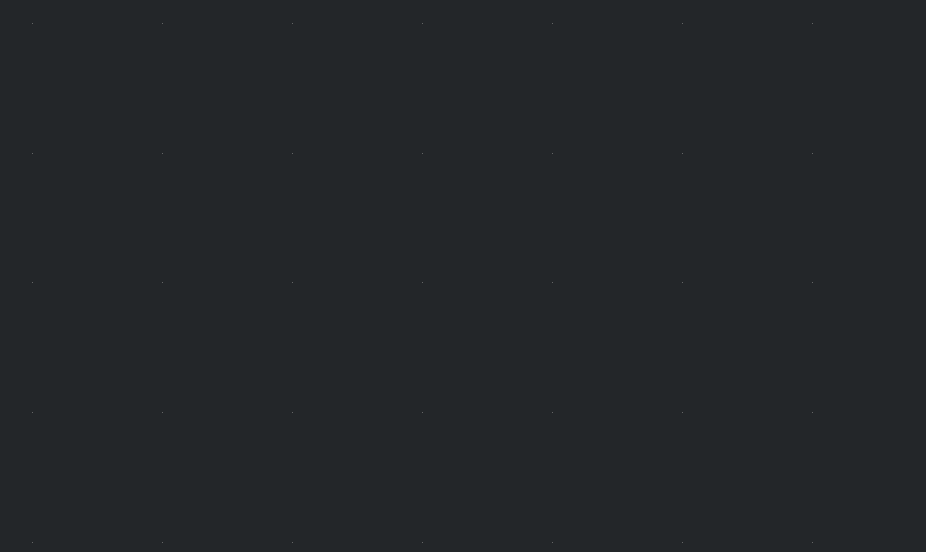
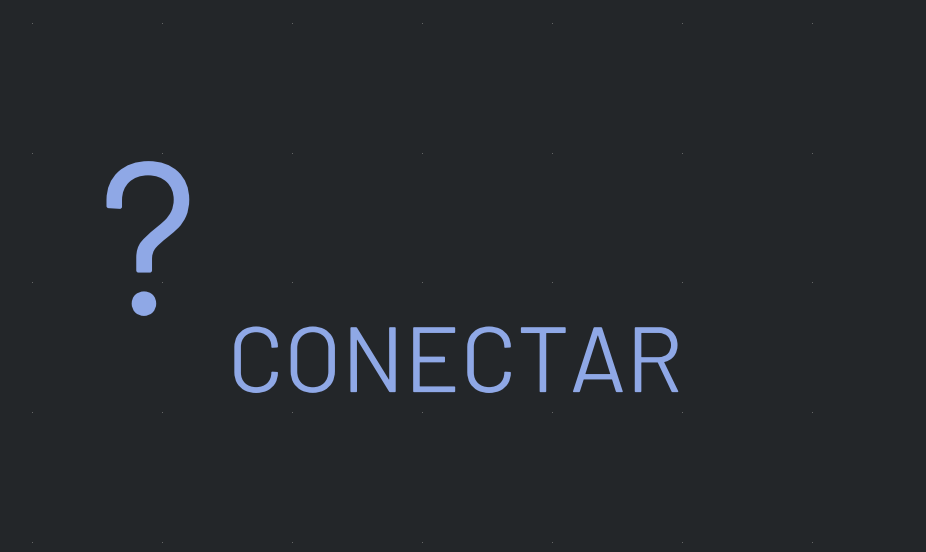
text: none -> ? (147, 238)
text: none -> CONECTAR (456, 359)

